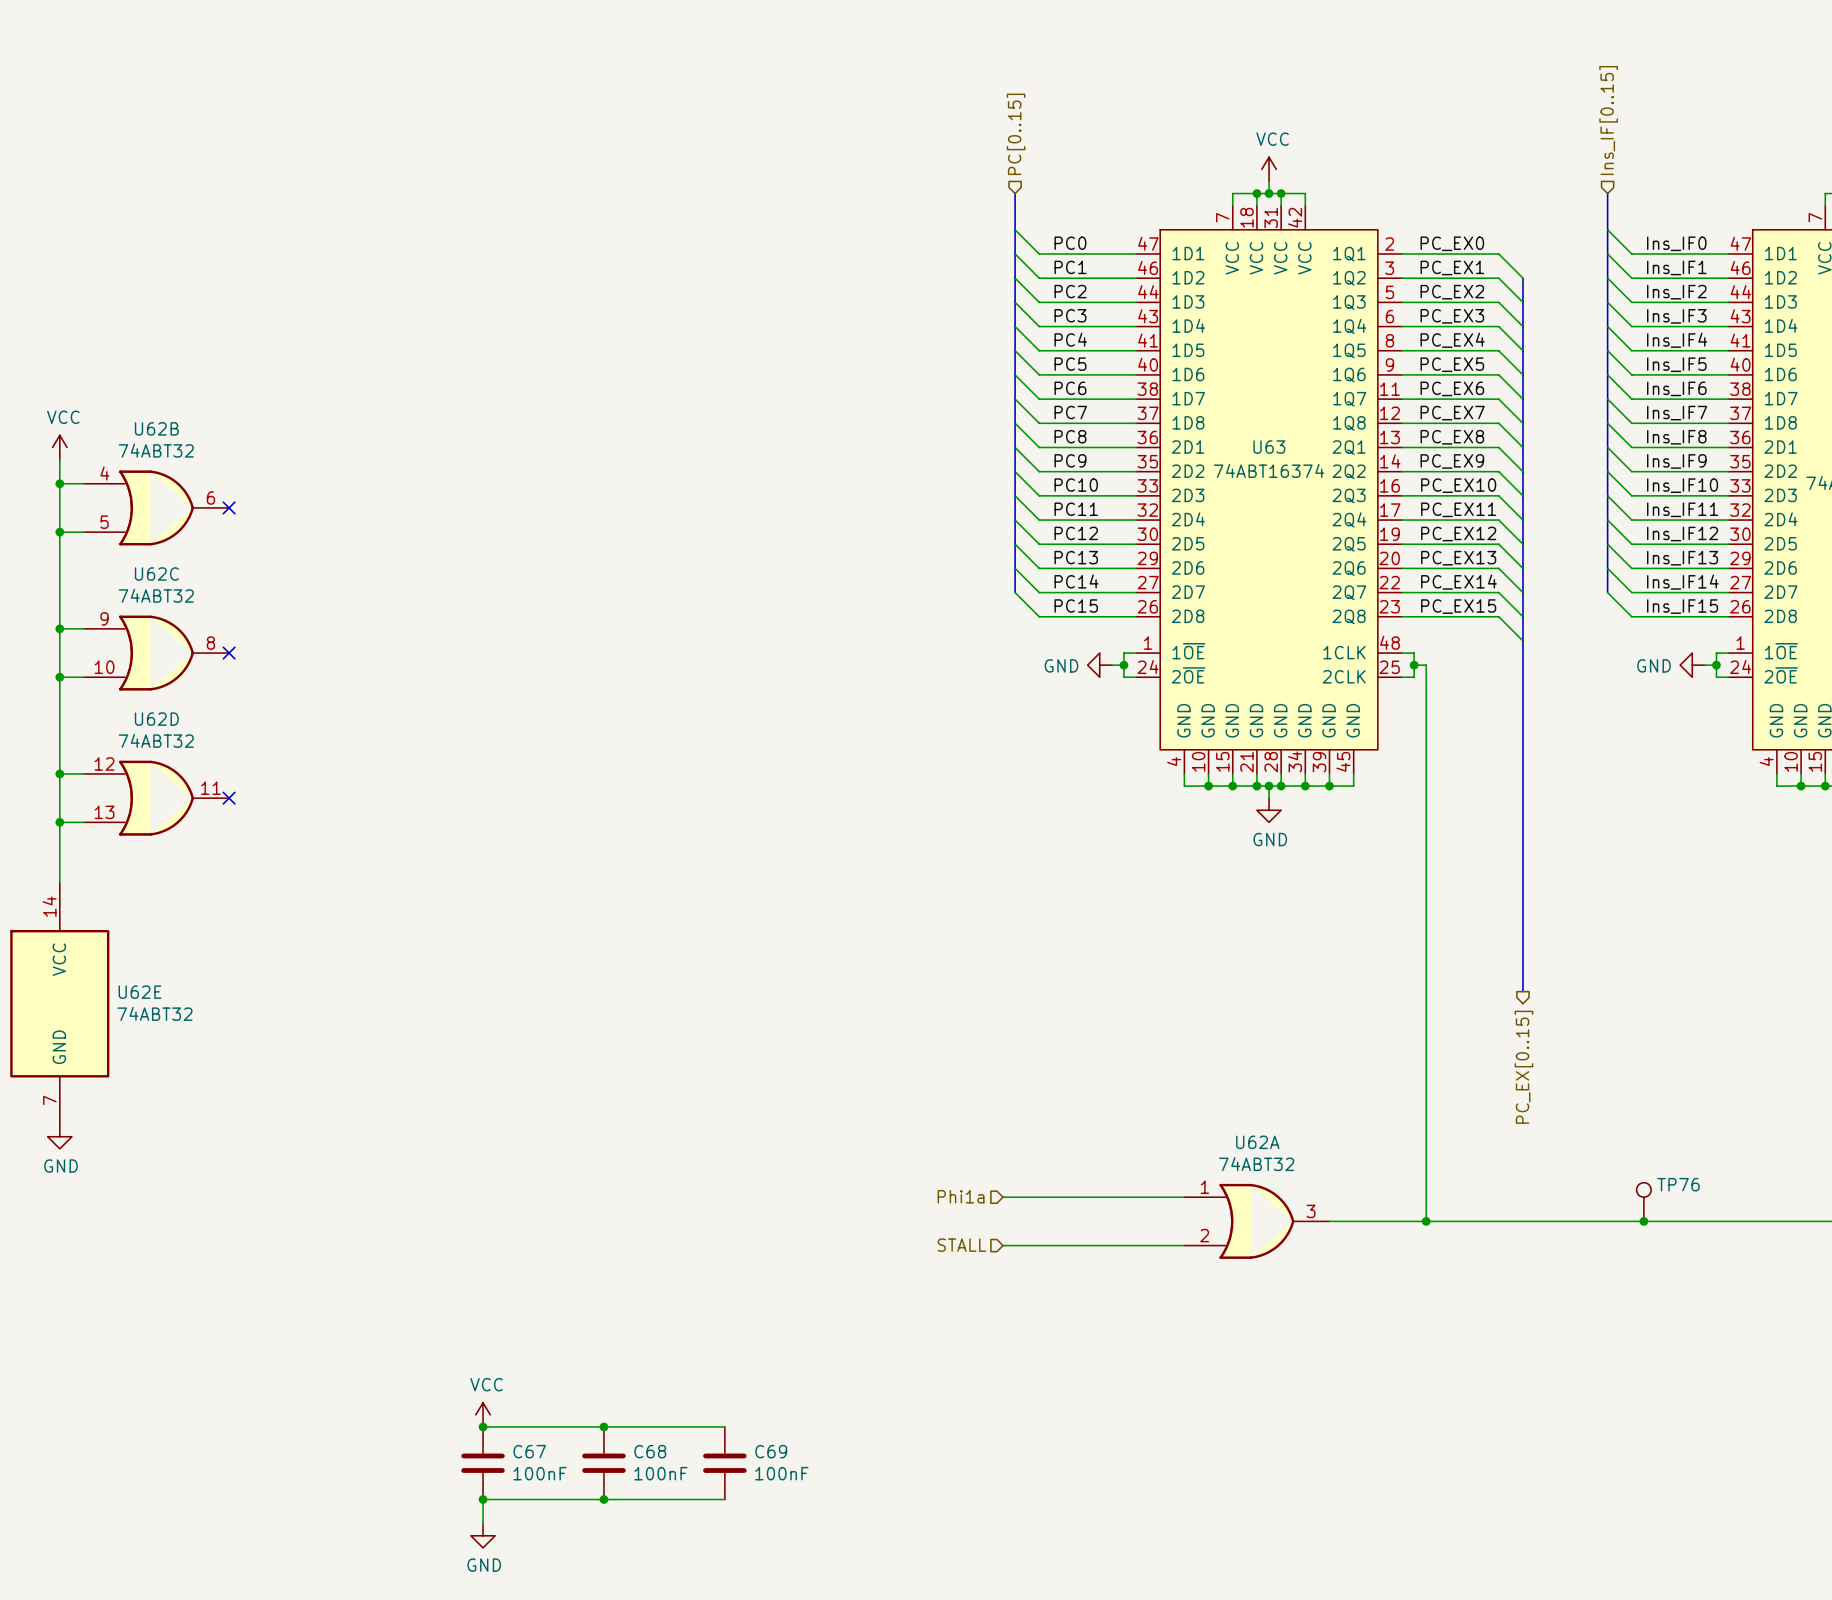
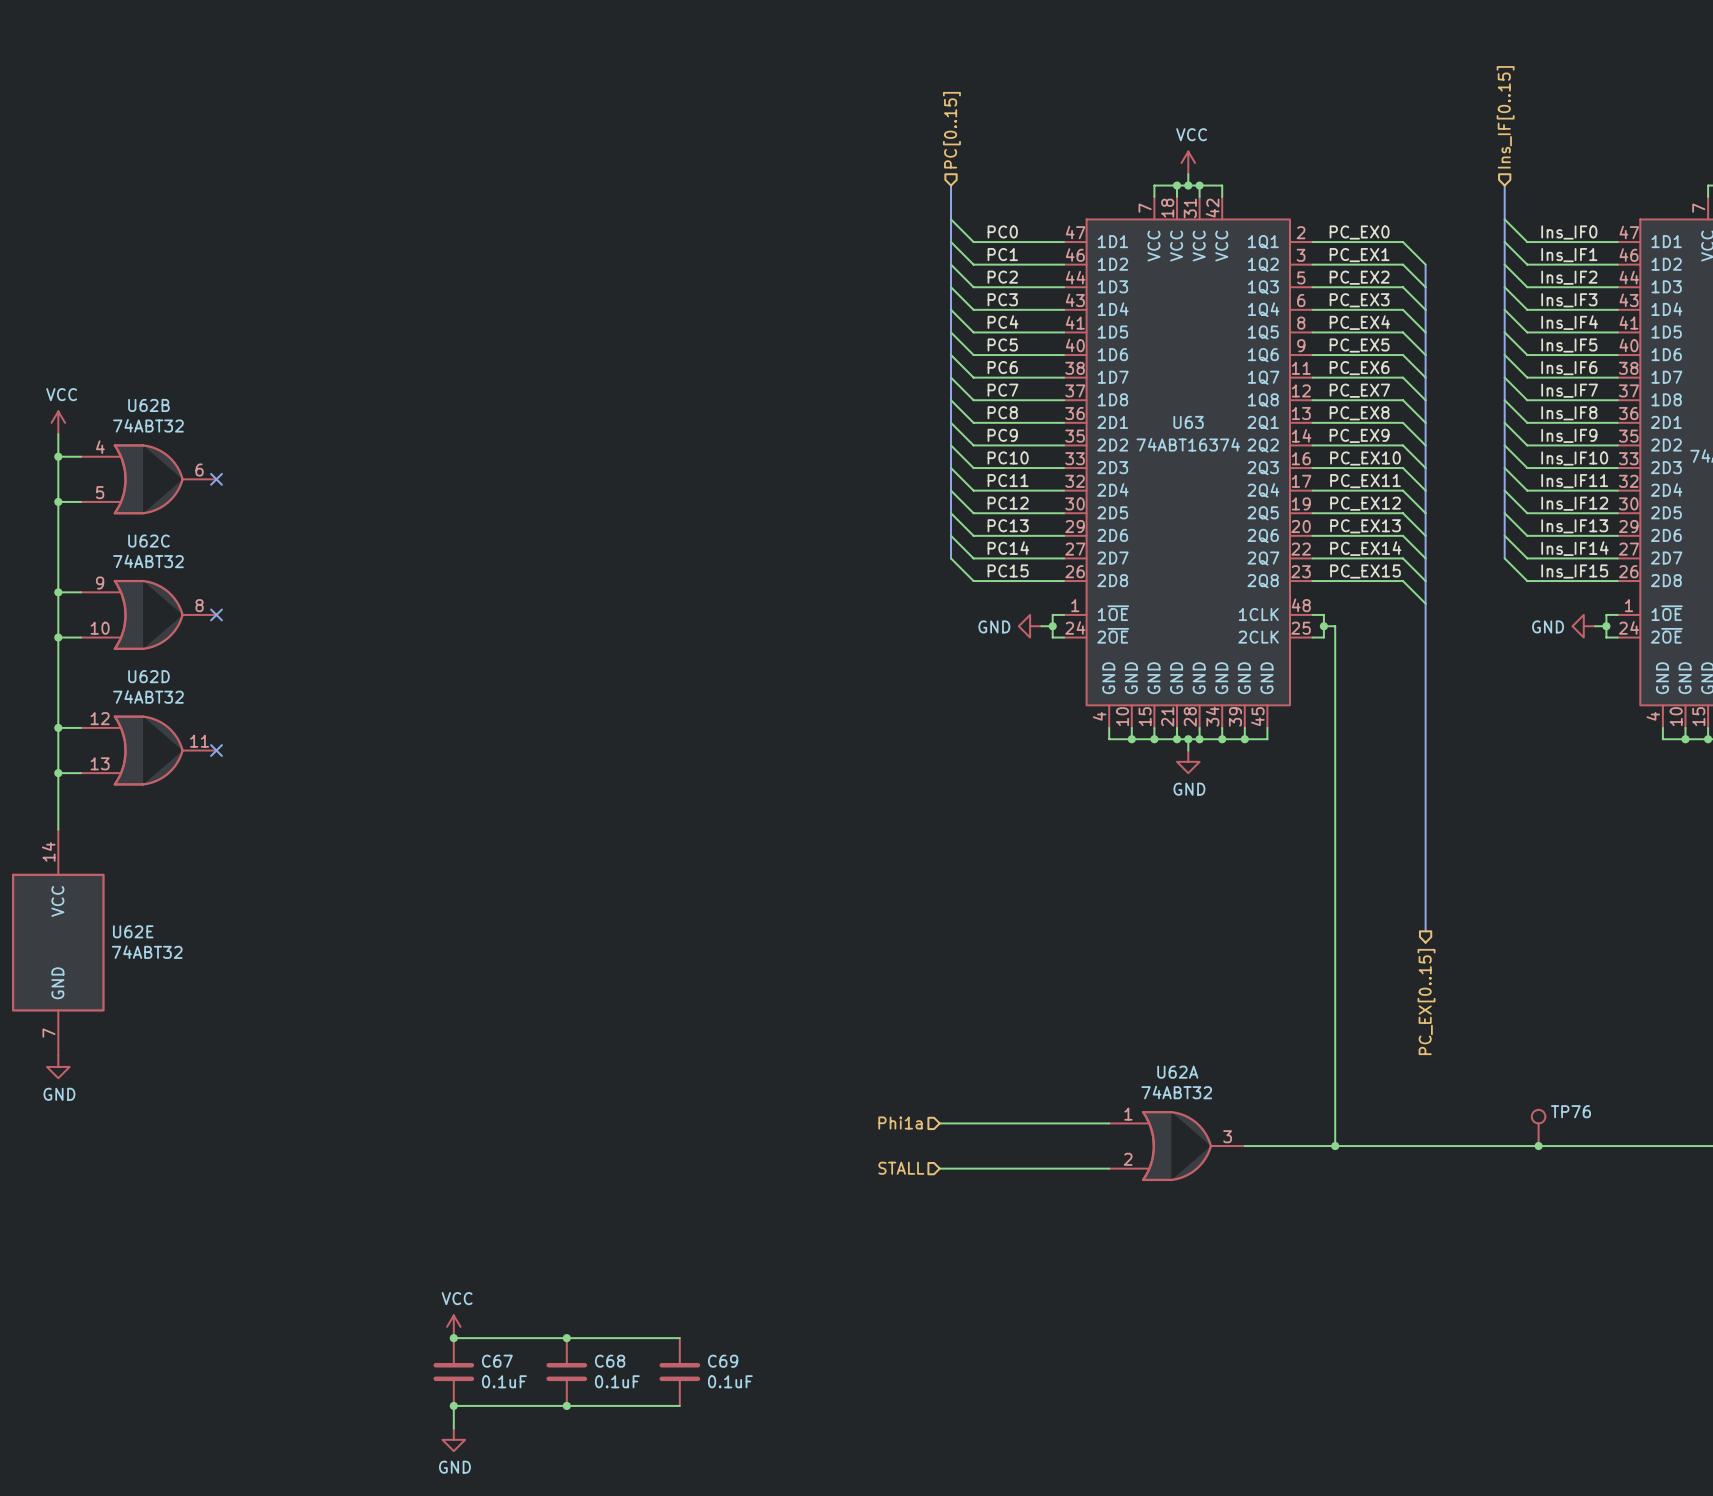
C67 value: 100nF (540, 1473) -> 0.1uF (504, 1381)
C68 value: 100nF (660, 1473) -> 0.1uF (617, 1381)
C69 value: 100nF (781, 1473) -> 0.1uF (730, 1381)

